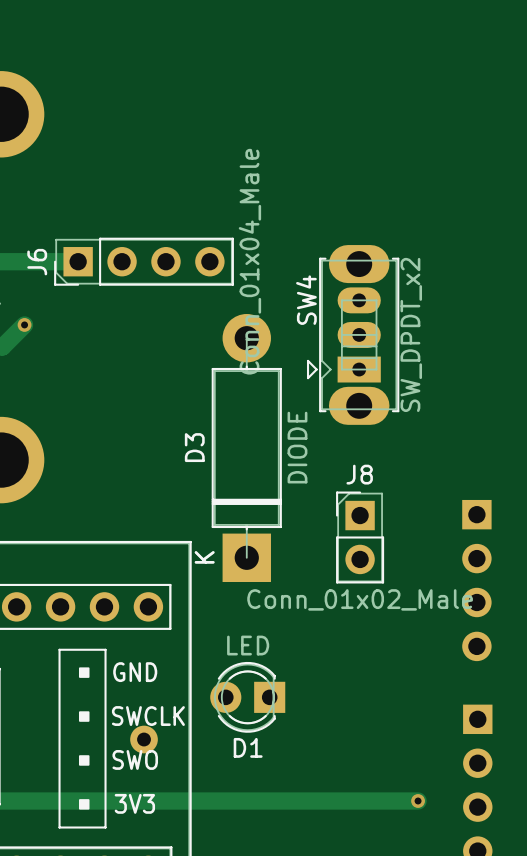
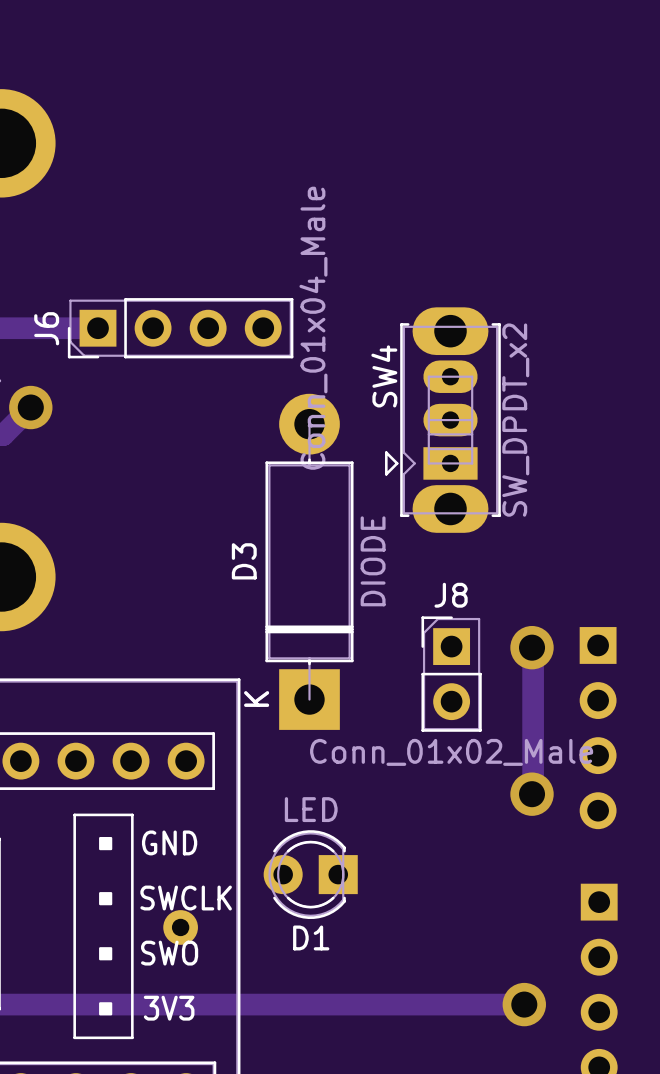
via size: [17, 318, 32, 332] -> [9, 385, 53, 430]
track: none -> (532, 647) (532, 794)
via: none -> (532, 647)
via: none -> (532, 794)
via size: [411, 794, 425, 808] -> [502, 982, 546, 1027]

